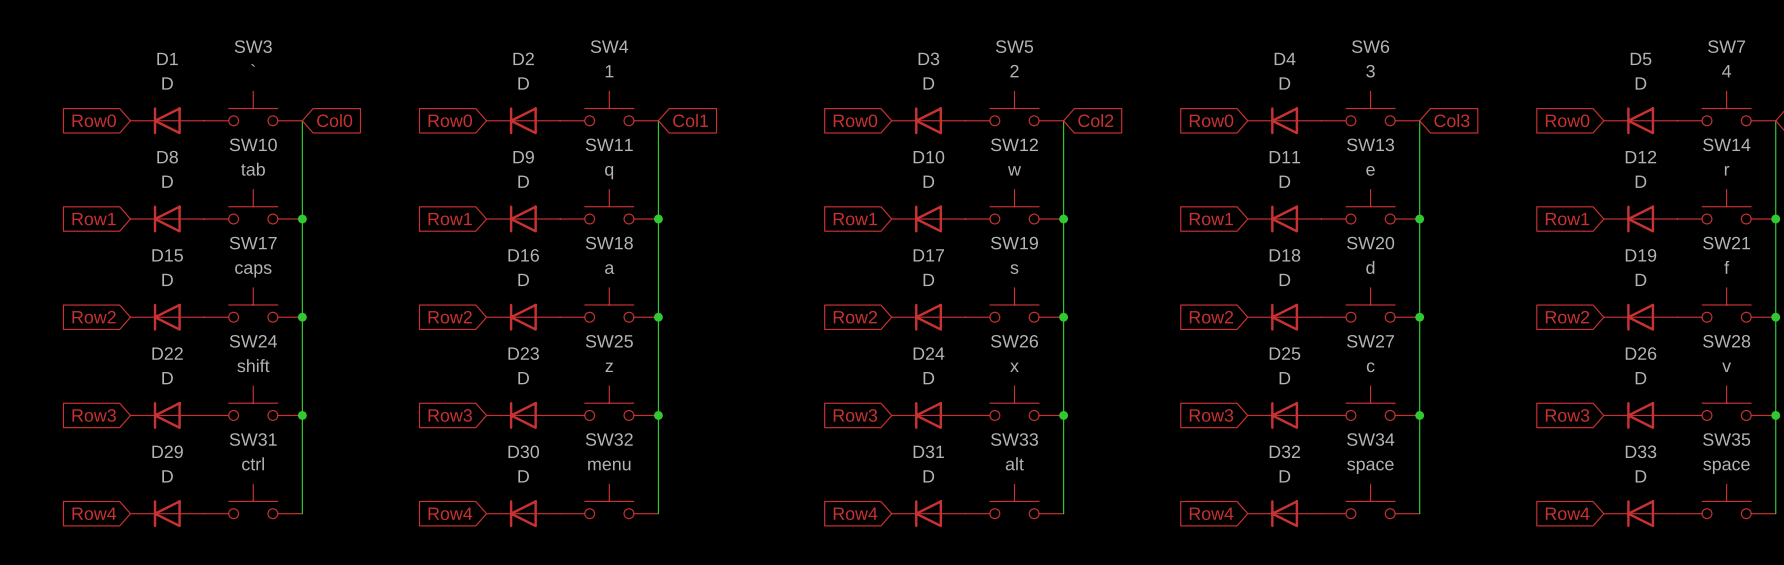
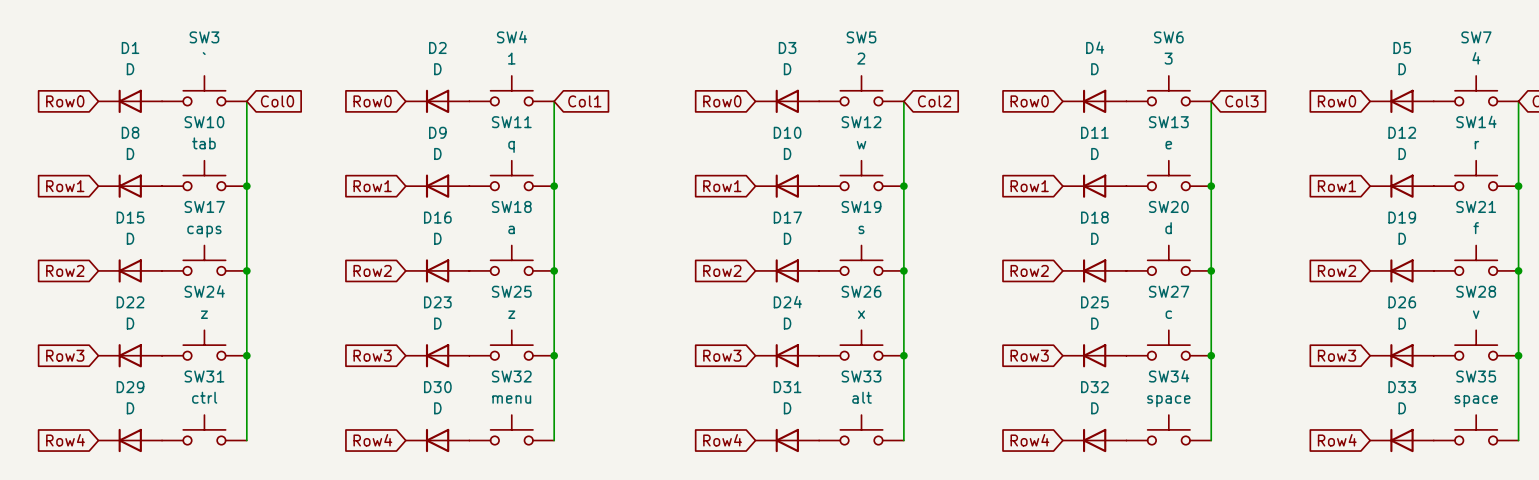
SW24 value: shift (253, 365) -> z (204, 314)

